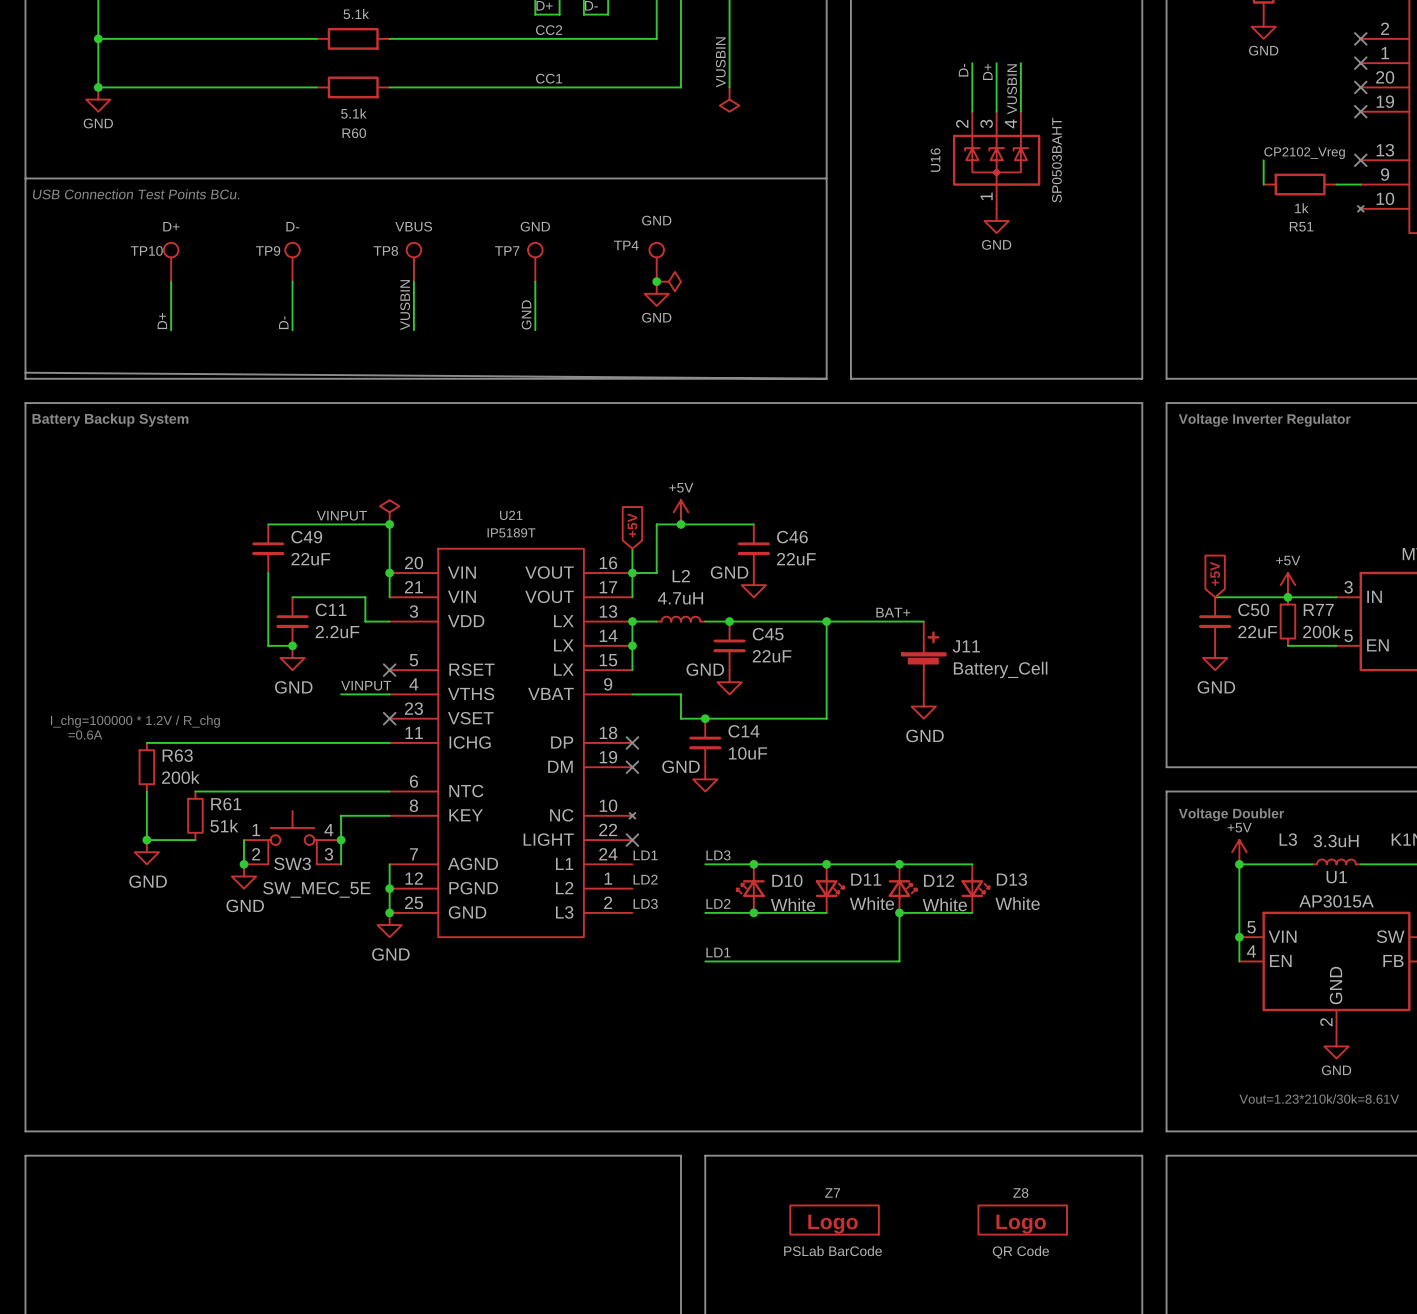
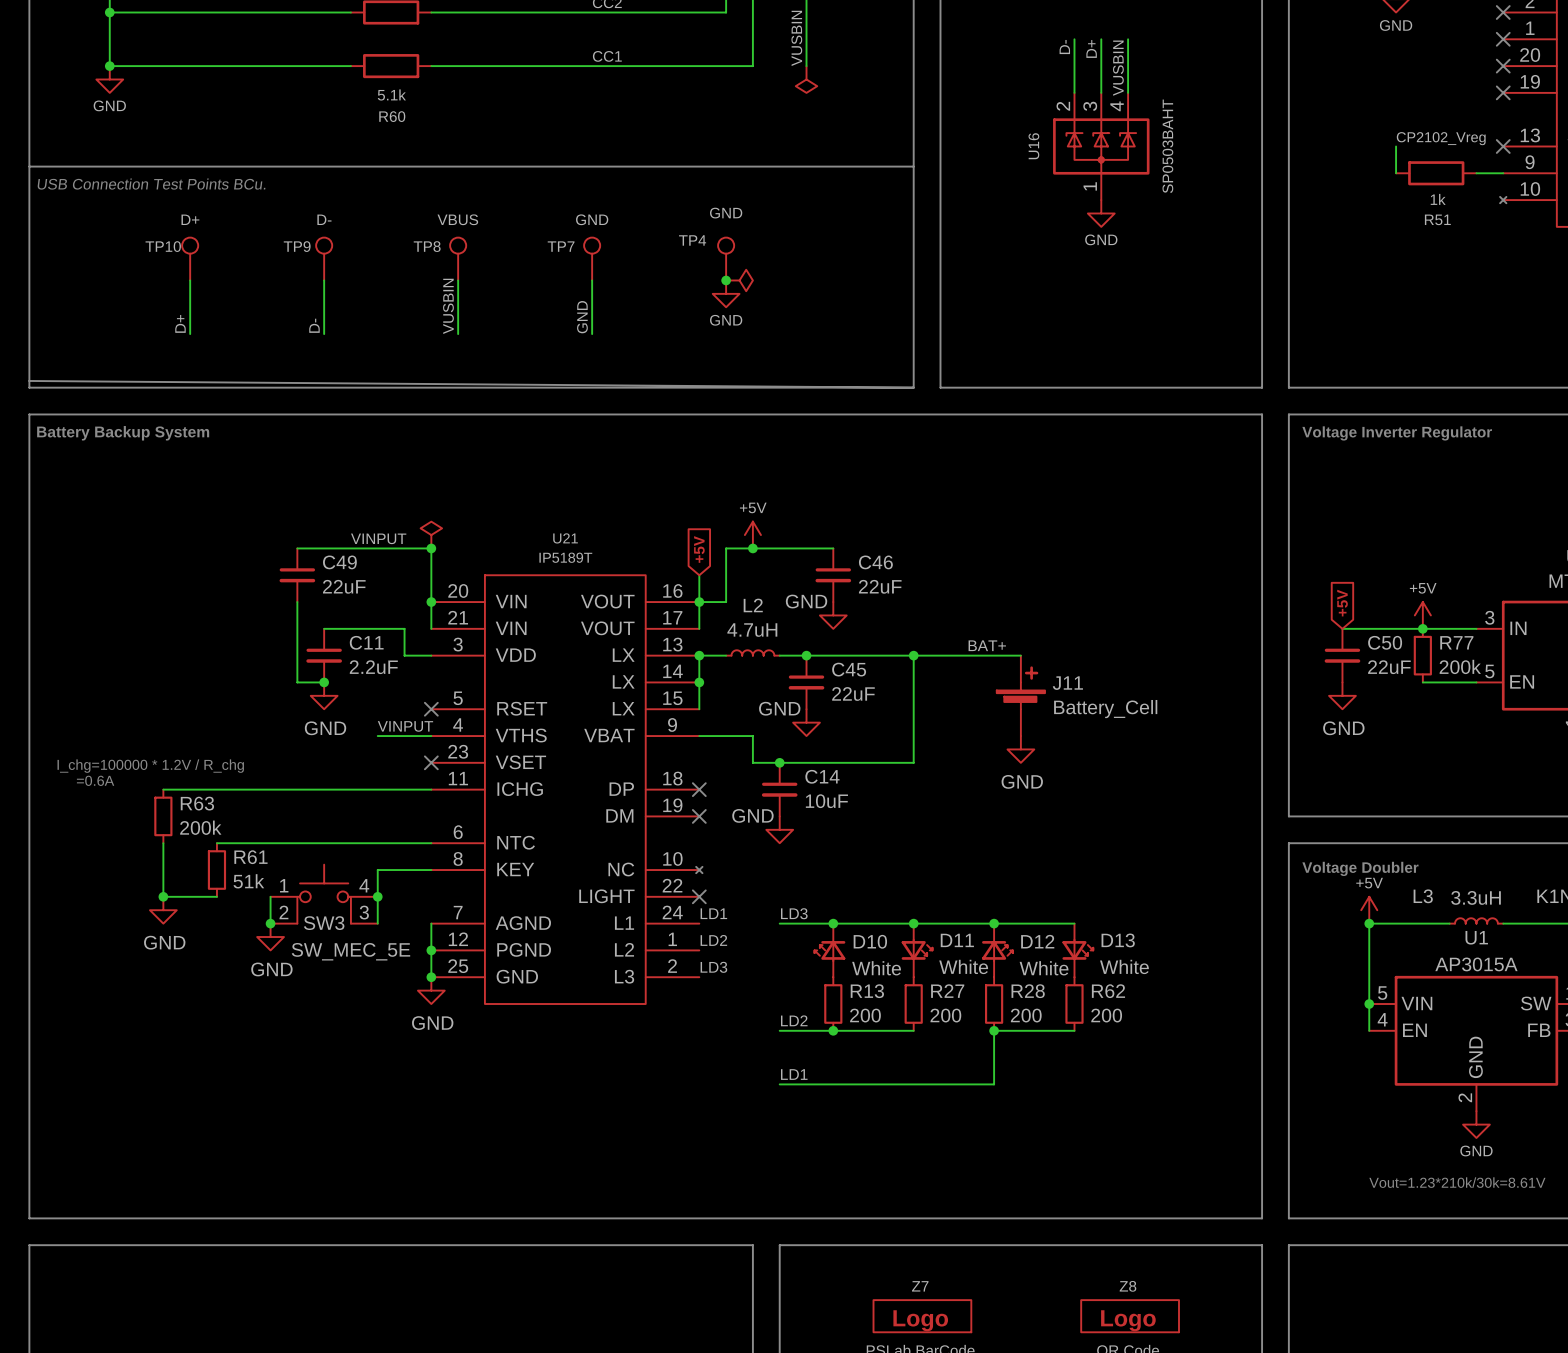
label: LD2 (718, 903) -> none
wire: (705, 912) (826, 912) -> none
junction position: (753, 912) -> (833, 1030)
junction position: (899, 912) -> (994, 1030)
wire: (972, 912) (899, 912) (899, 961) (826, 961) -> none
R13: none -> 200 (833, 1004)
R27: none -> 200 (913, 1004)
R28: none -> 200 (994, 1004)
R62: none -> 200 (1074, 1004)
label: LD1 (718, 952) -> LD2 (794, 1020)
wire: none -> (1074, 1030) (994, 1030) (994, 1084) (779, 1084)
label: none -> LD1 (794, 1074)

